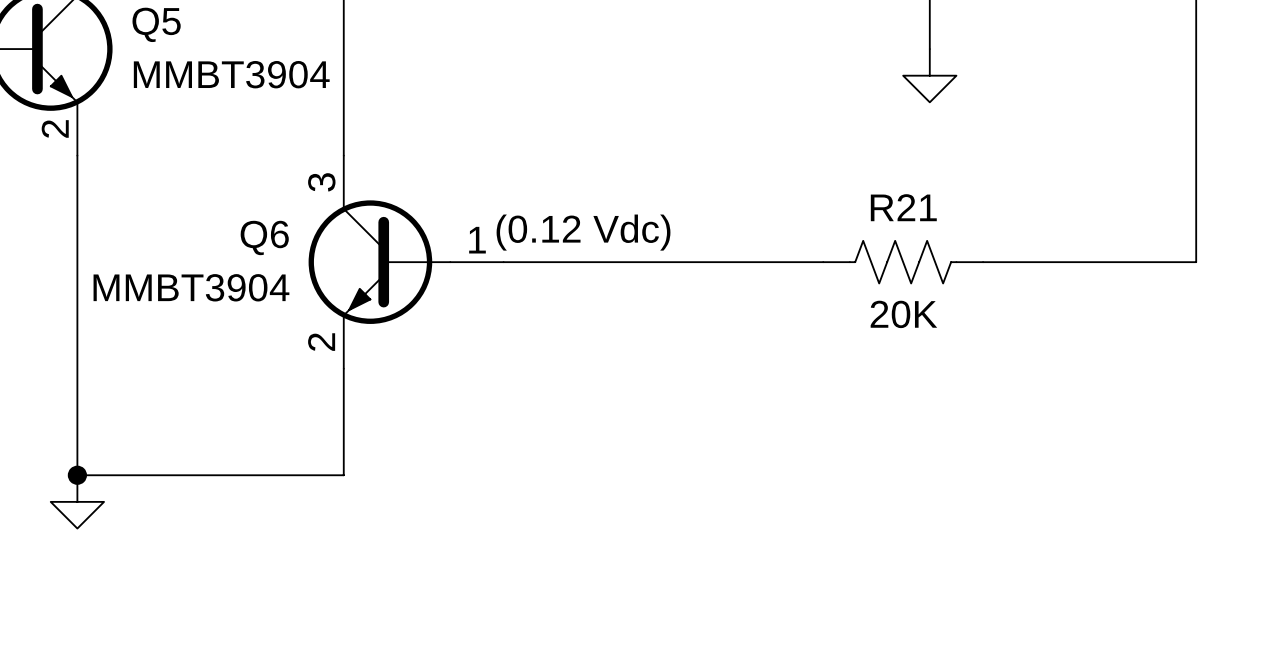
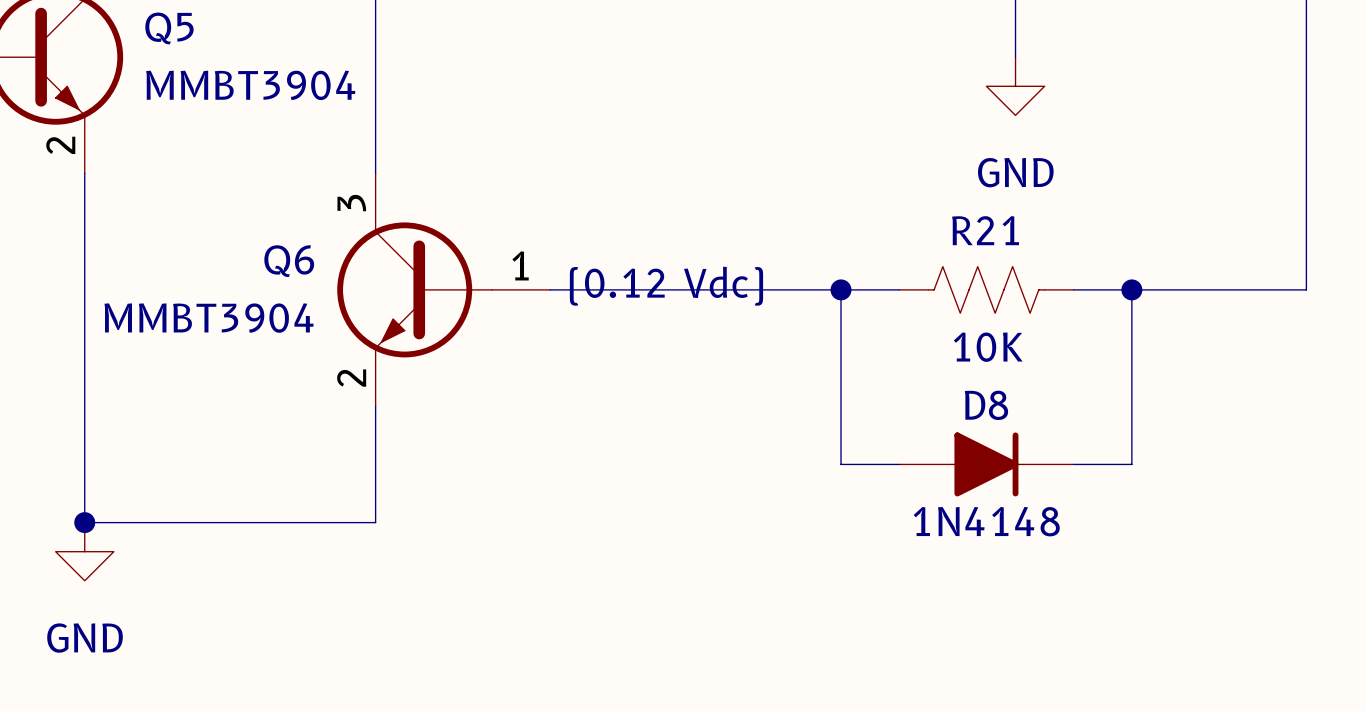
power symbol text: none -> GND (1015, 172)
text position: (0.12 Vdc) (583, 232) -> (0.12 Vdc) (666, 286)
wire: none -> (841, 289) (841, 464) (899, 464)
junction: none -> (841, 289)
wire: none -> (1131, 289) (1131, 464) (1073, 464)
junction: none -> (1131, 289)
R21 value: 20K (903, 314) -> 10K (988, 347)
D8: none -> 1N4148 (986, 464)
power symbol text: none -> GND (85, 638)

